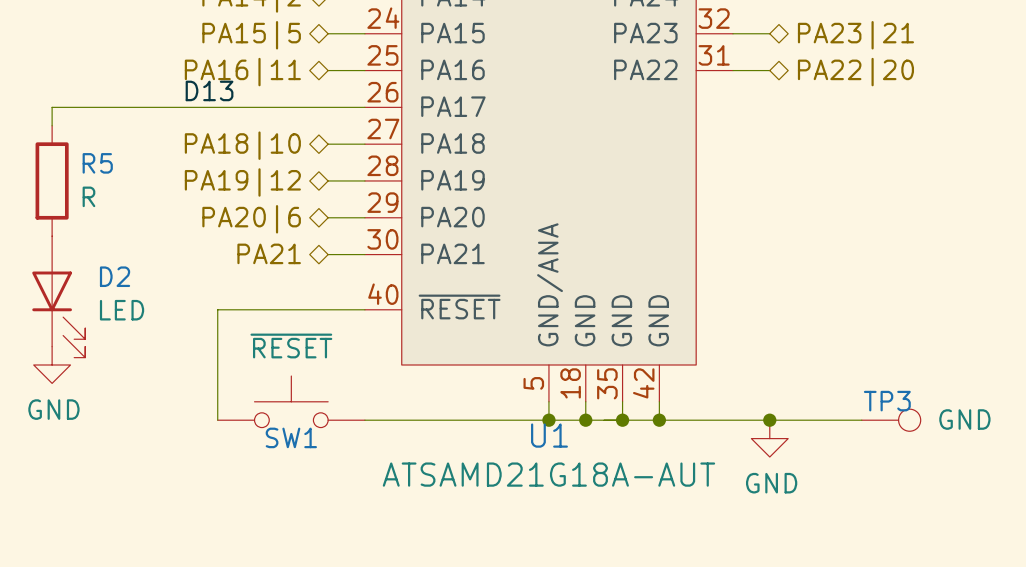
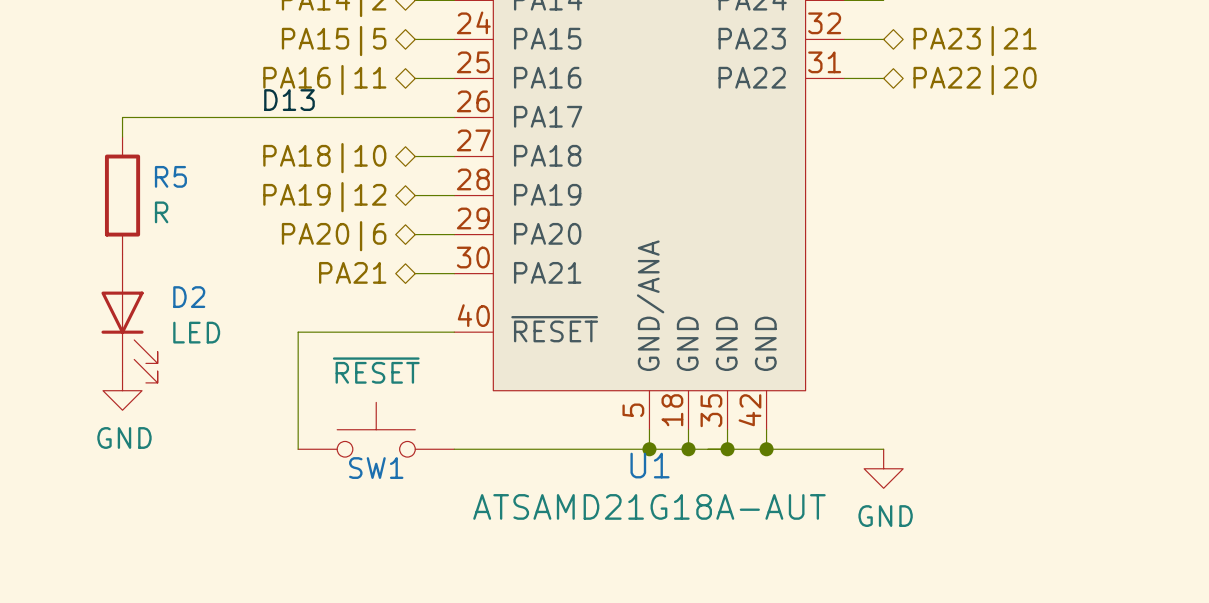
wire: (769, 420) (861, 420) -> none
junction: (769, 420) -> none
TP3: GND (891, 420) -> none

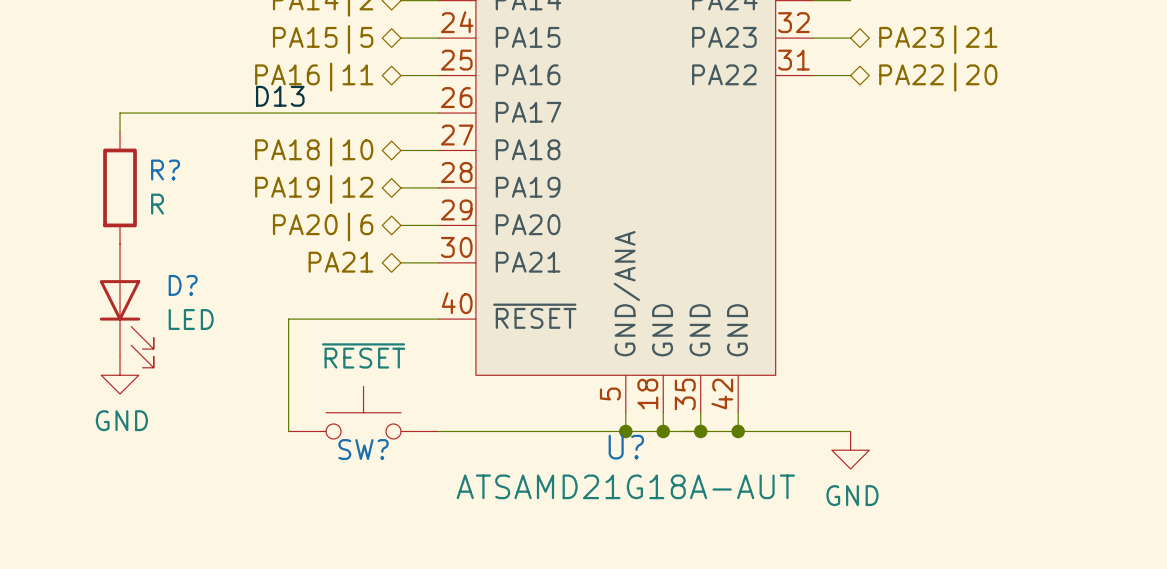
R5 name: R5 (170, 176) -> R? (165, 170)
D2 name: D2 (189, 297) -> D? (183, 285)
U1 name: U1 (650, 465) -> U? (626, 447)
SW1 name: SW1 (376, 468) -> SW? (363, 449)

